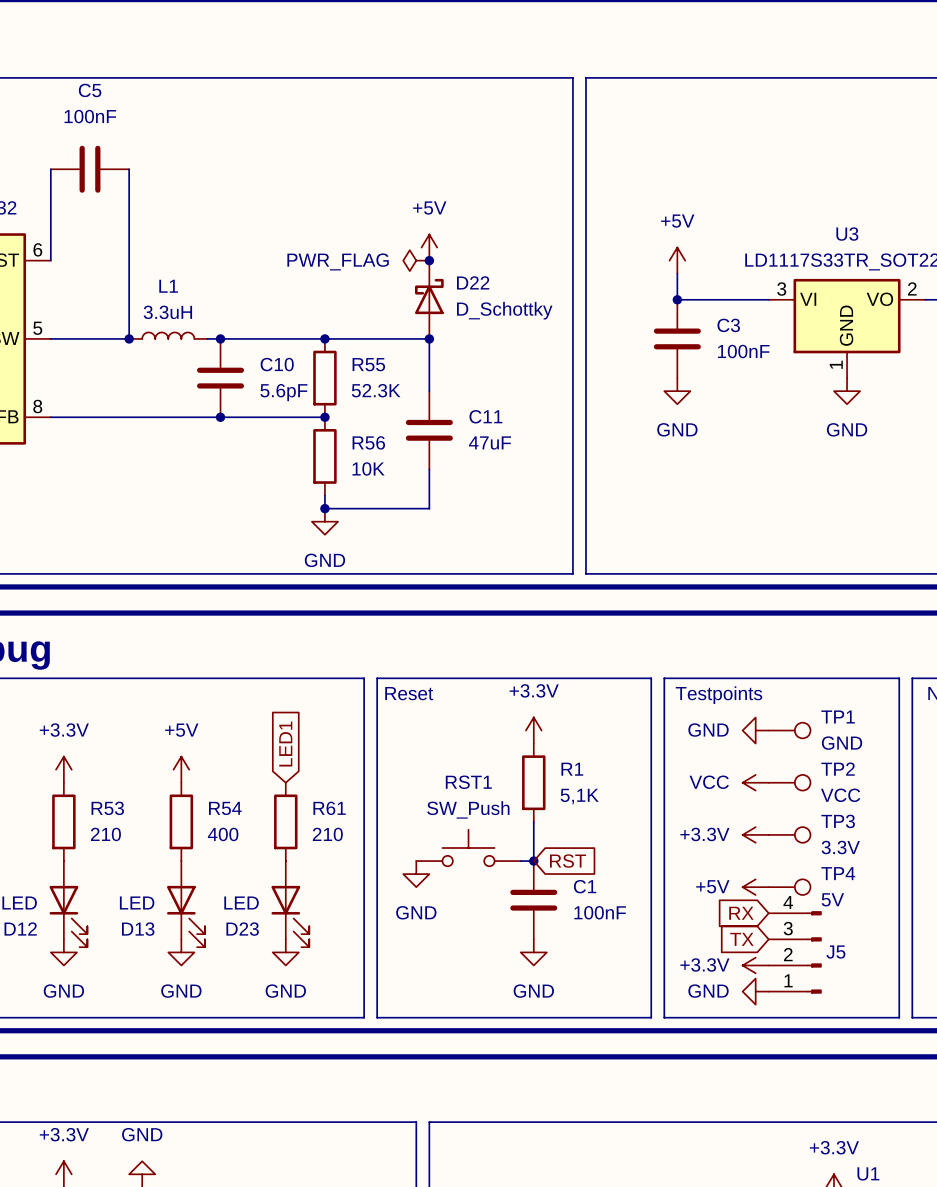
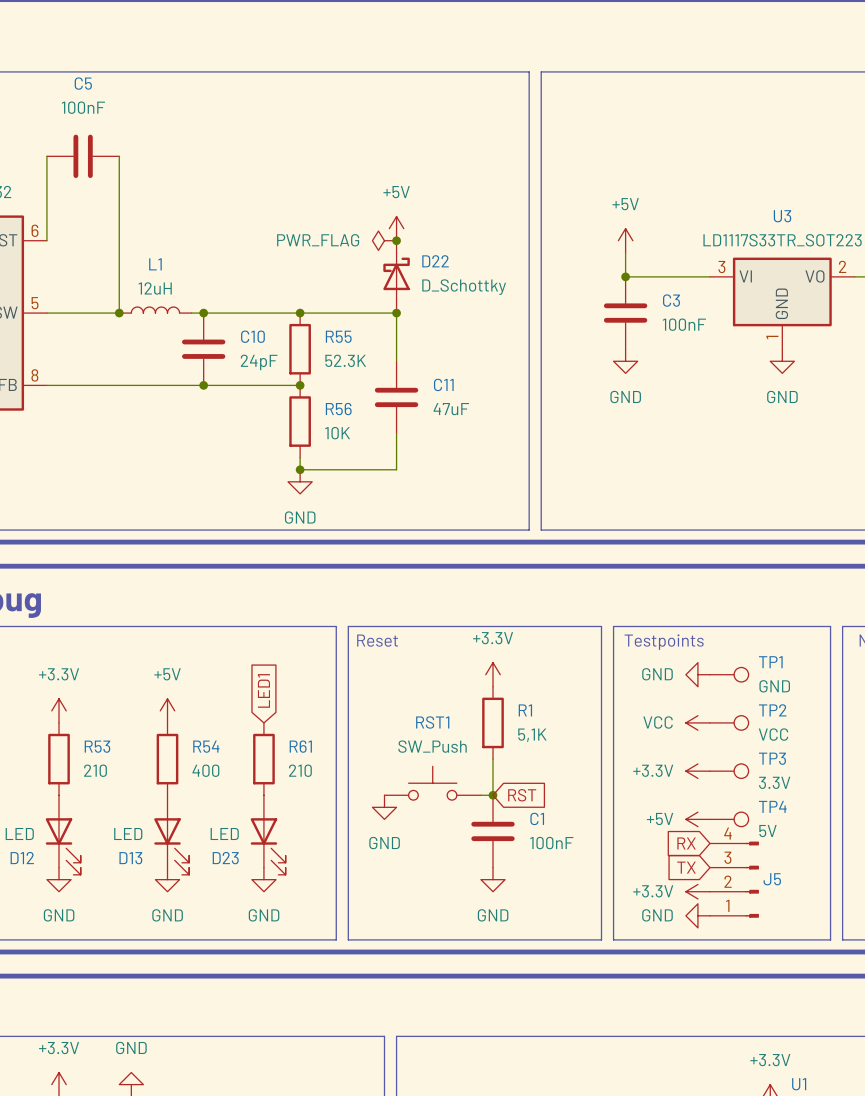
L1 value: 3.3uH (167, 312) -> 12uH (155, 288)
C10 value: 5.6pF (283, 392) -> 24pF (259, 362)

